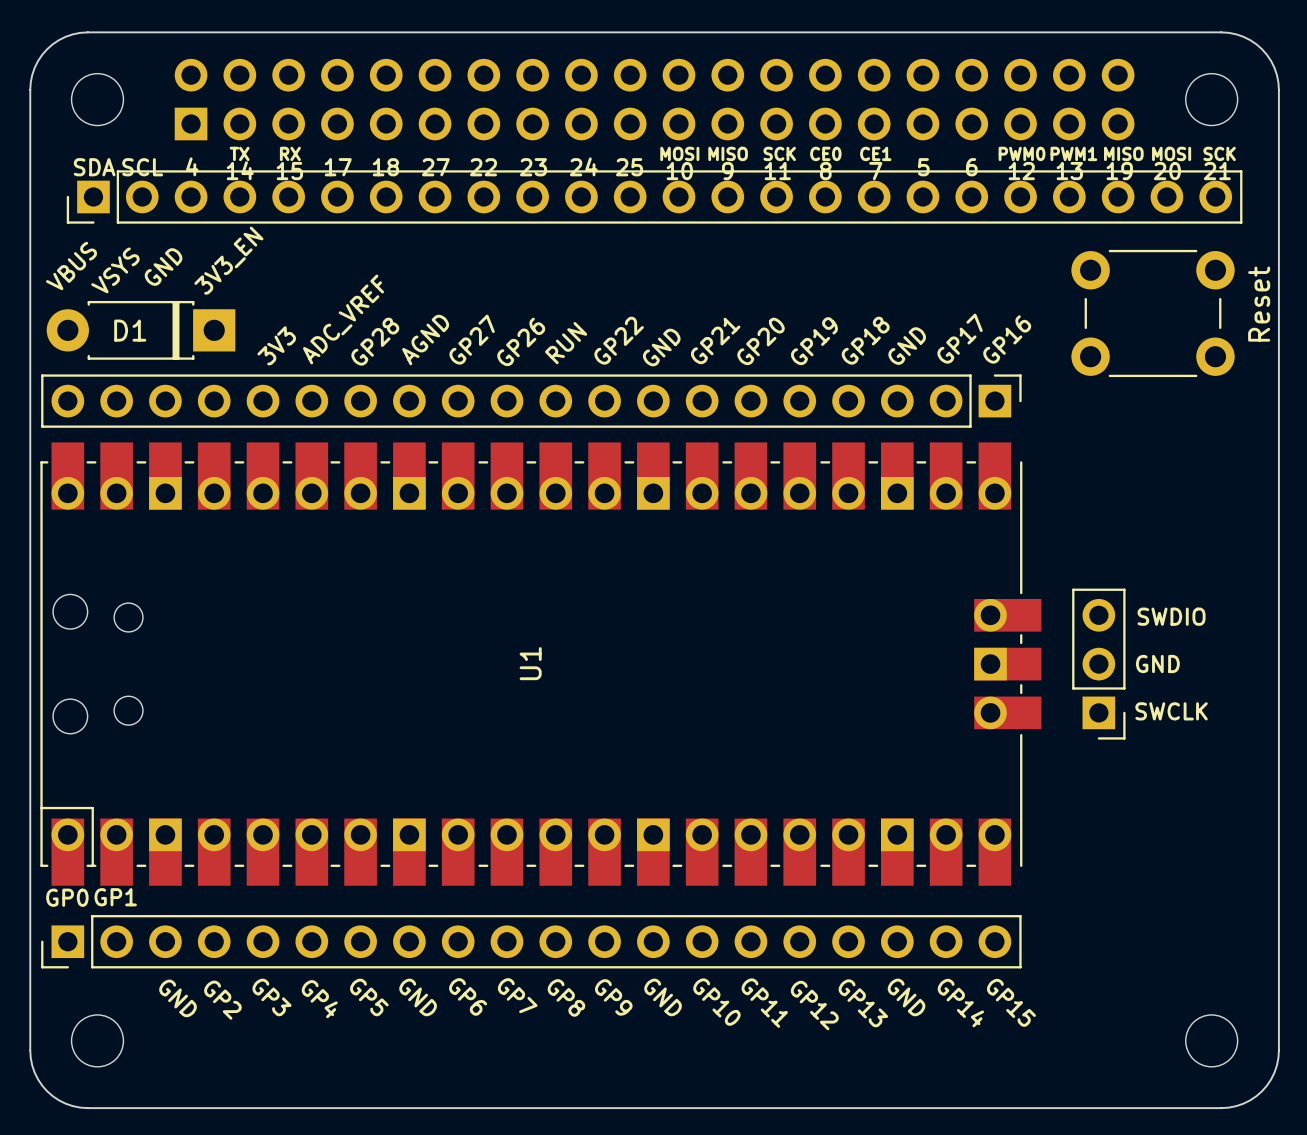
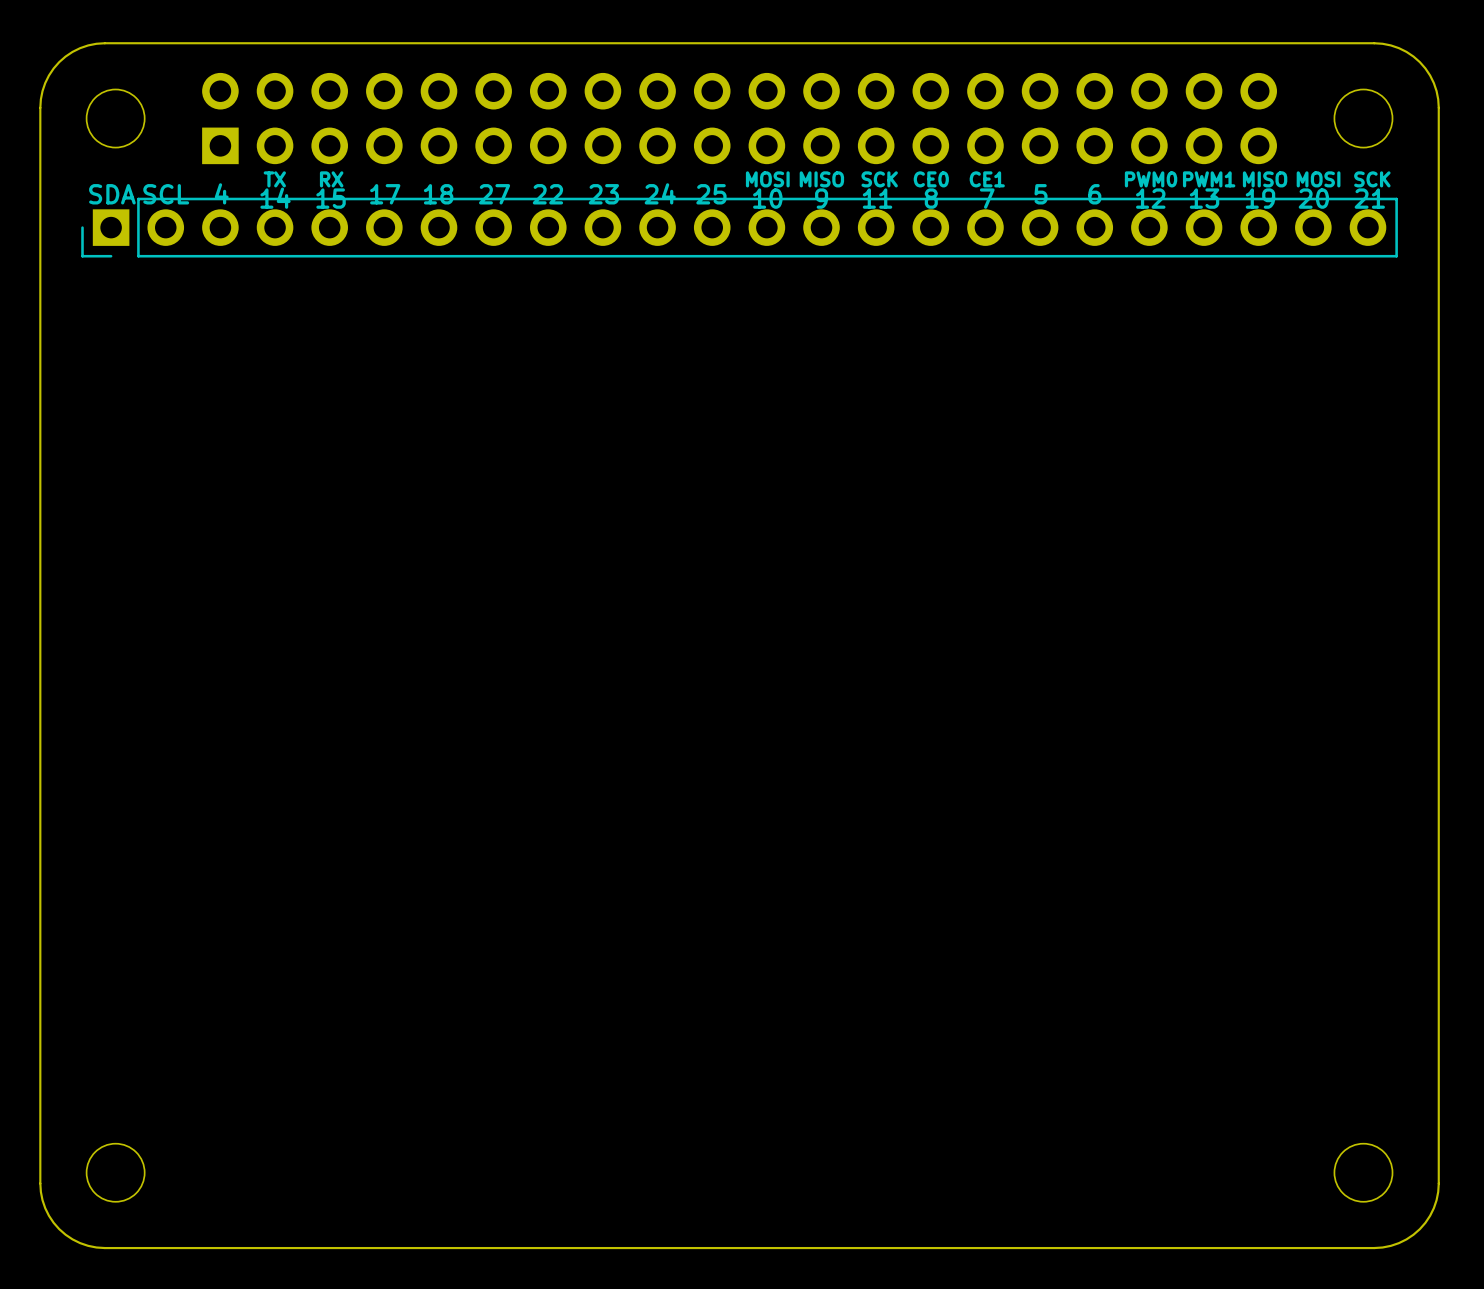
text: Reset (1259, 304) -> none
part: (1153, 313) -> none
D1: (141, 330) -> none
part: (531, 401) -> none
drawing: [1135, 654, 1180, 674] -> none
U1: (540, 664) -> none
part: (1098, 664) -> none
part: (531, 941) -> none

